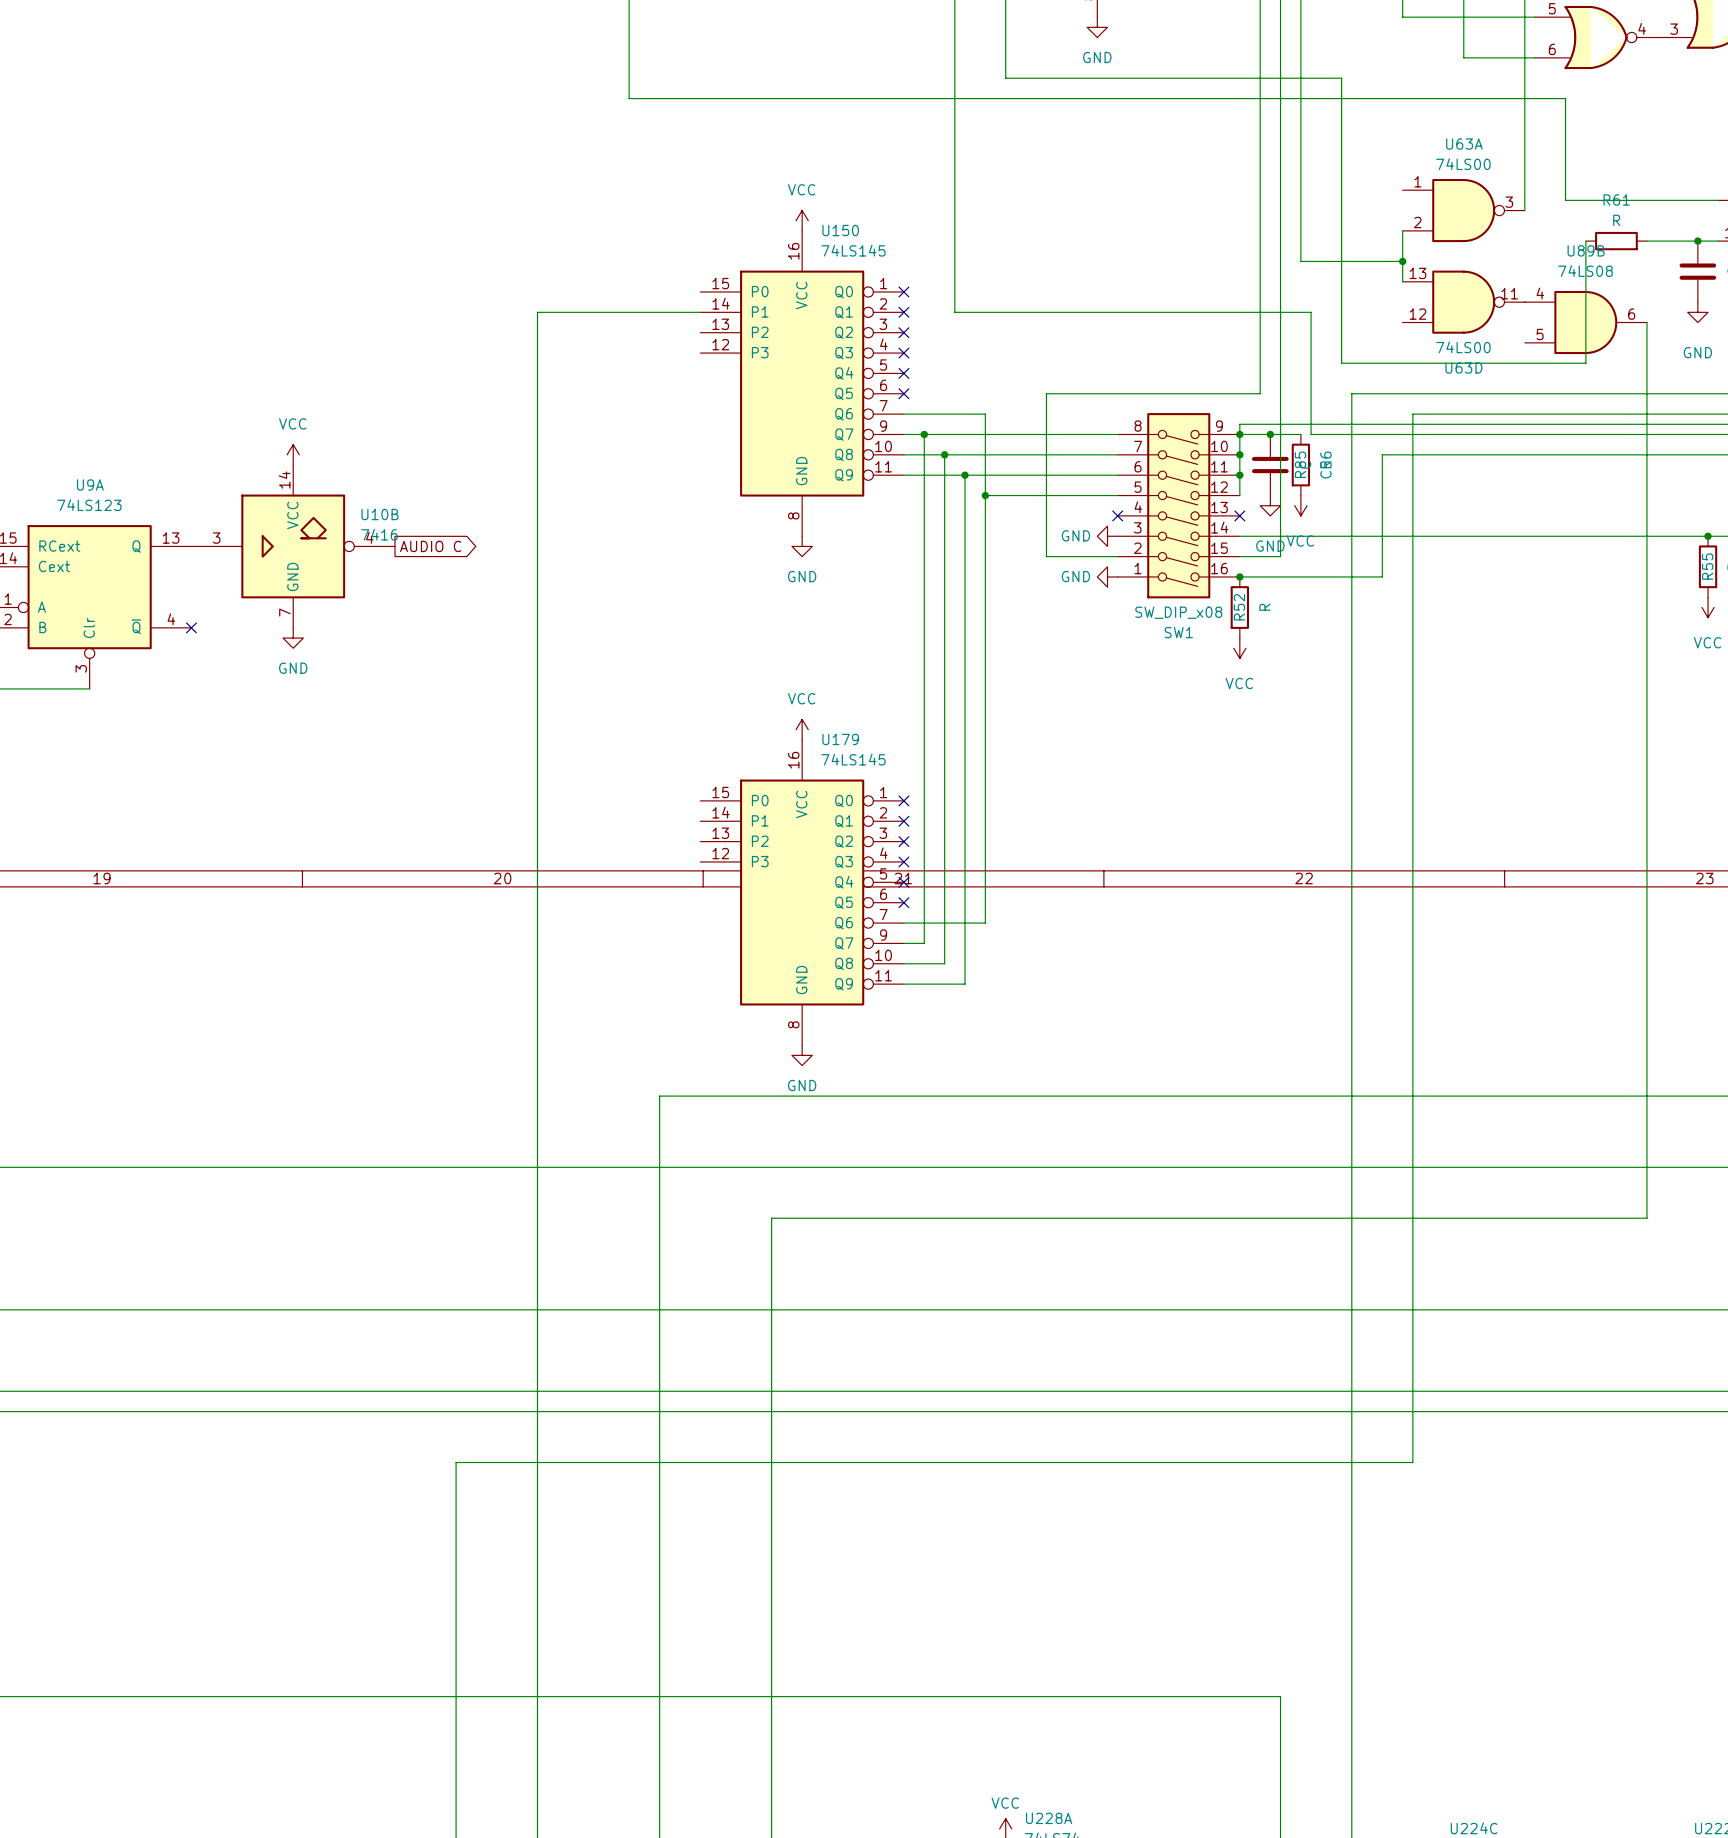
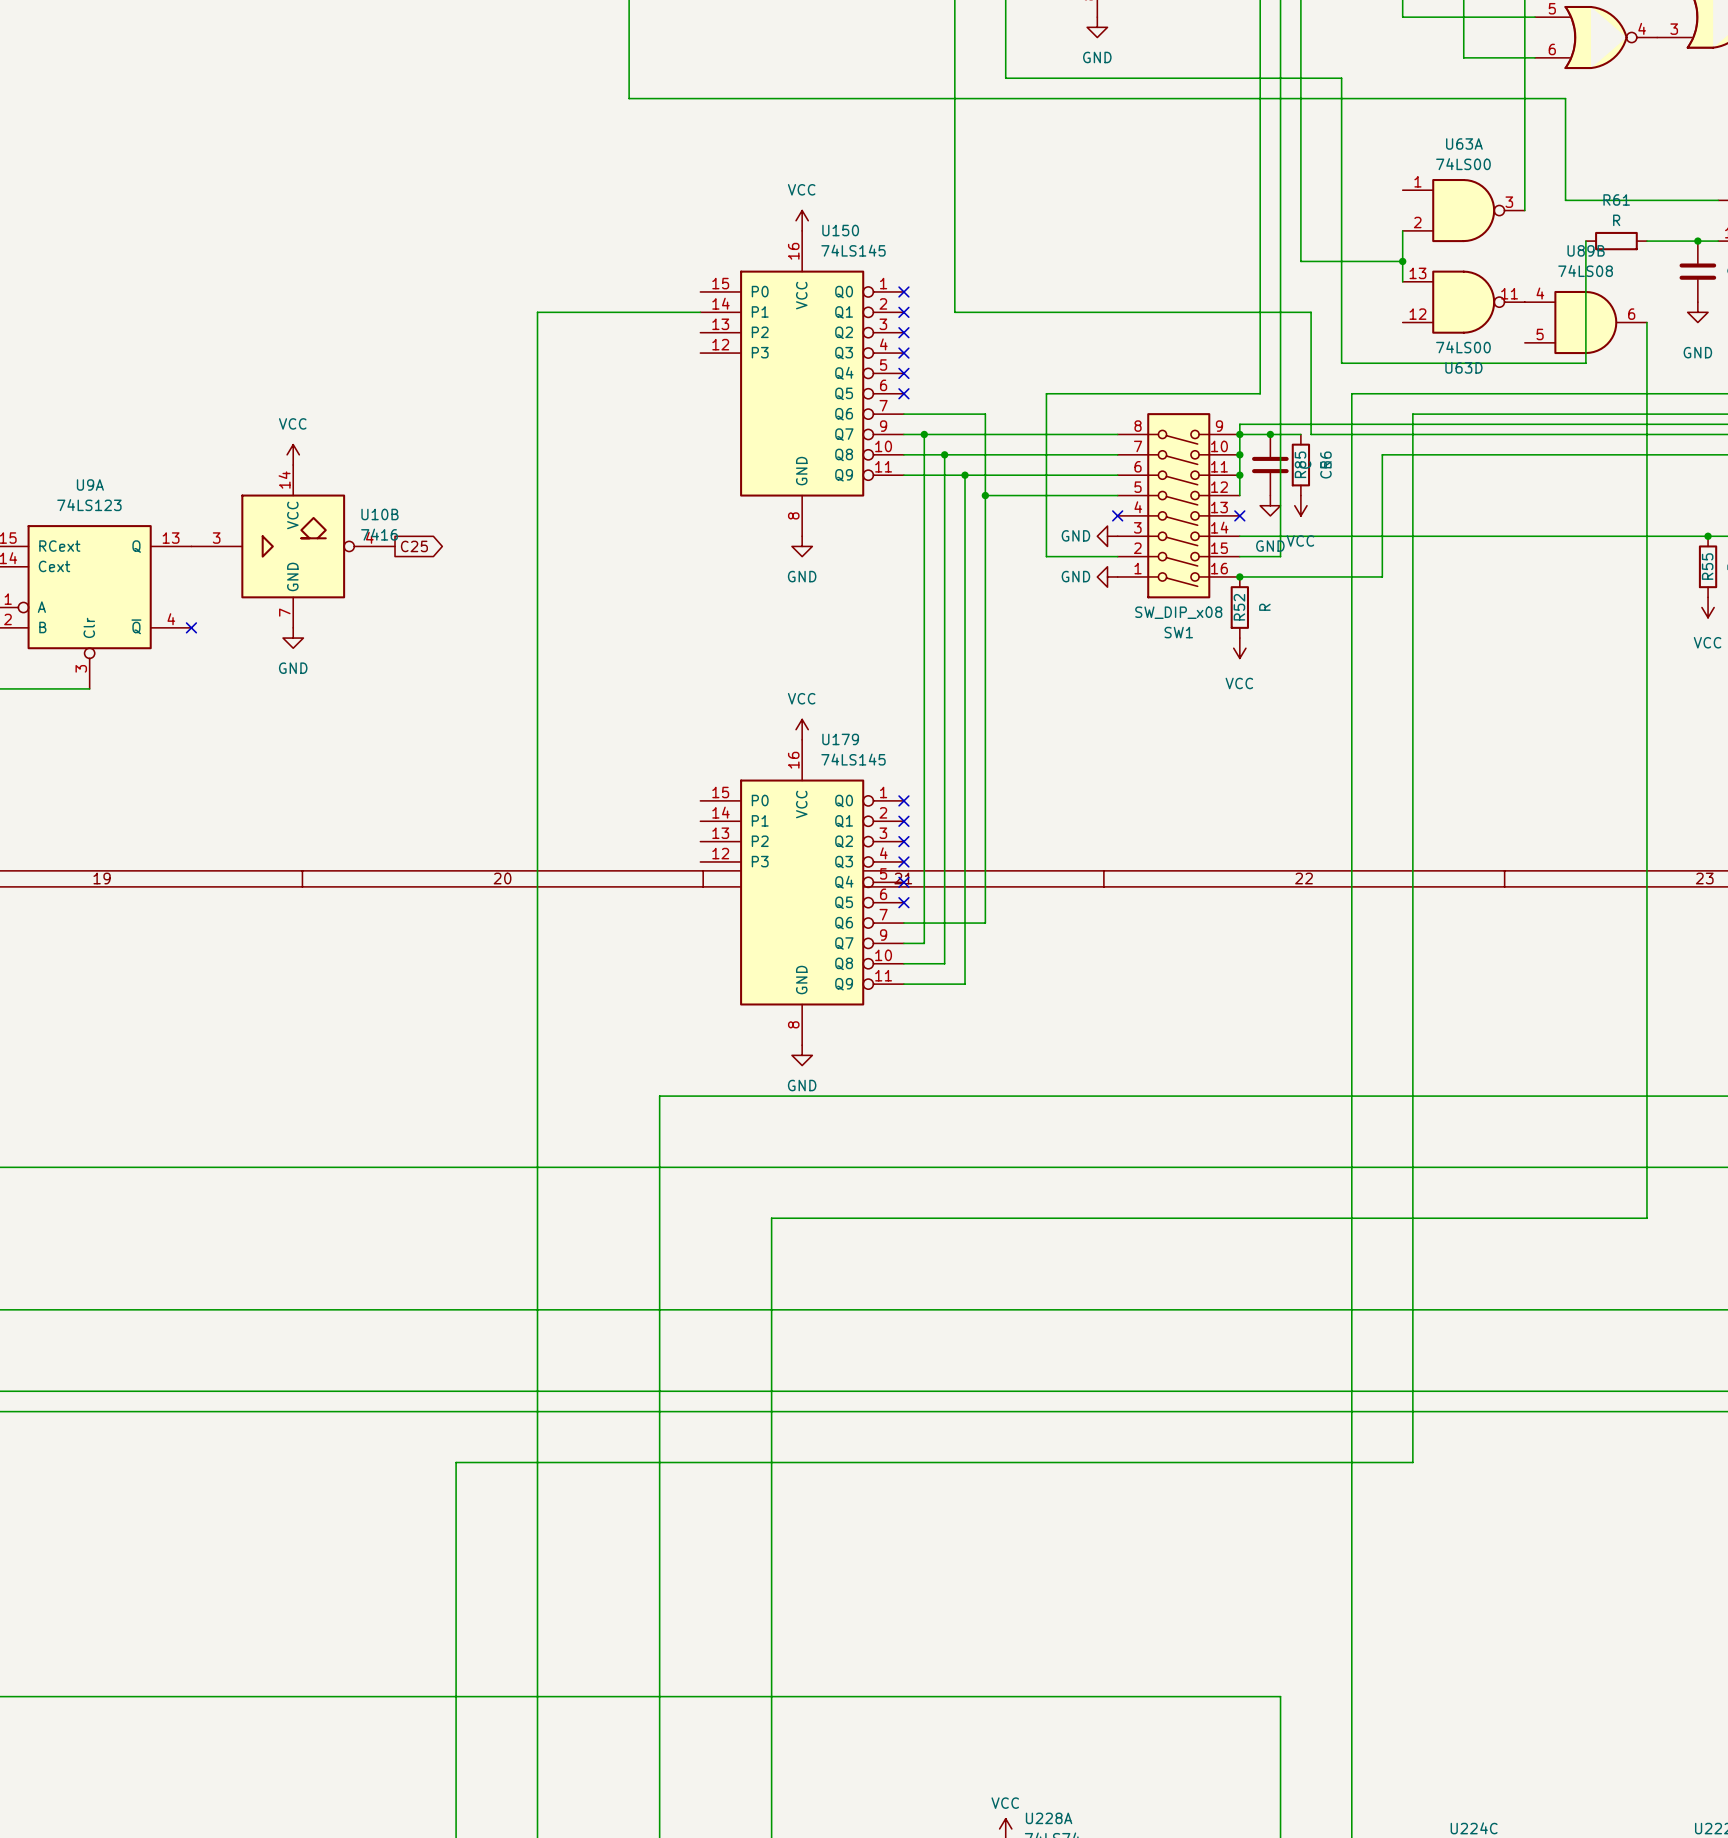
global label: AUDIO C (430, 546) -> C25 (414, 546)

